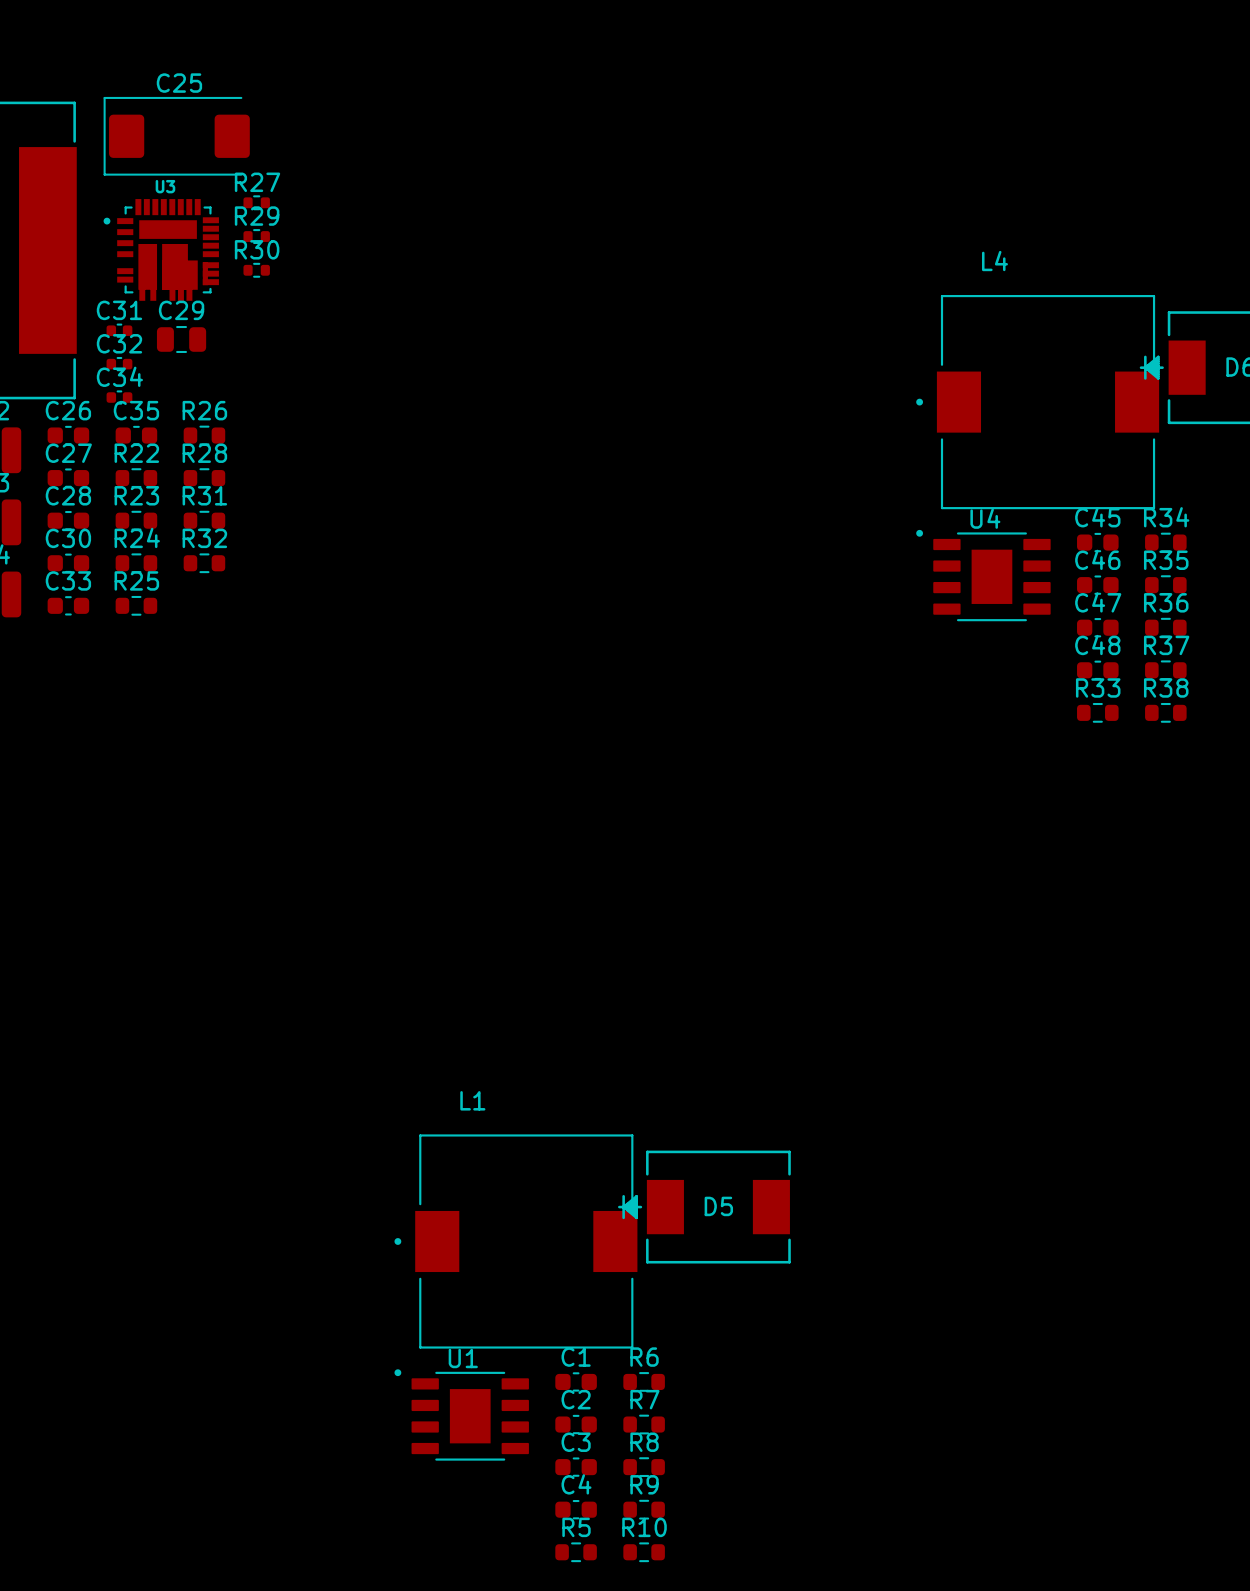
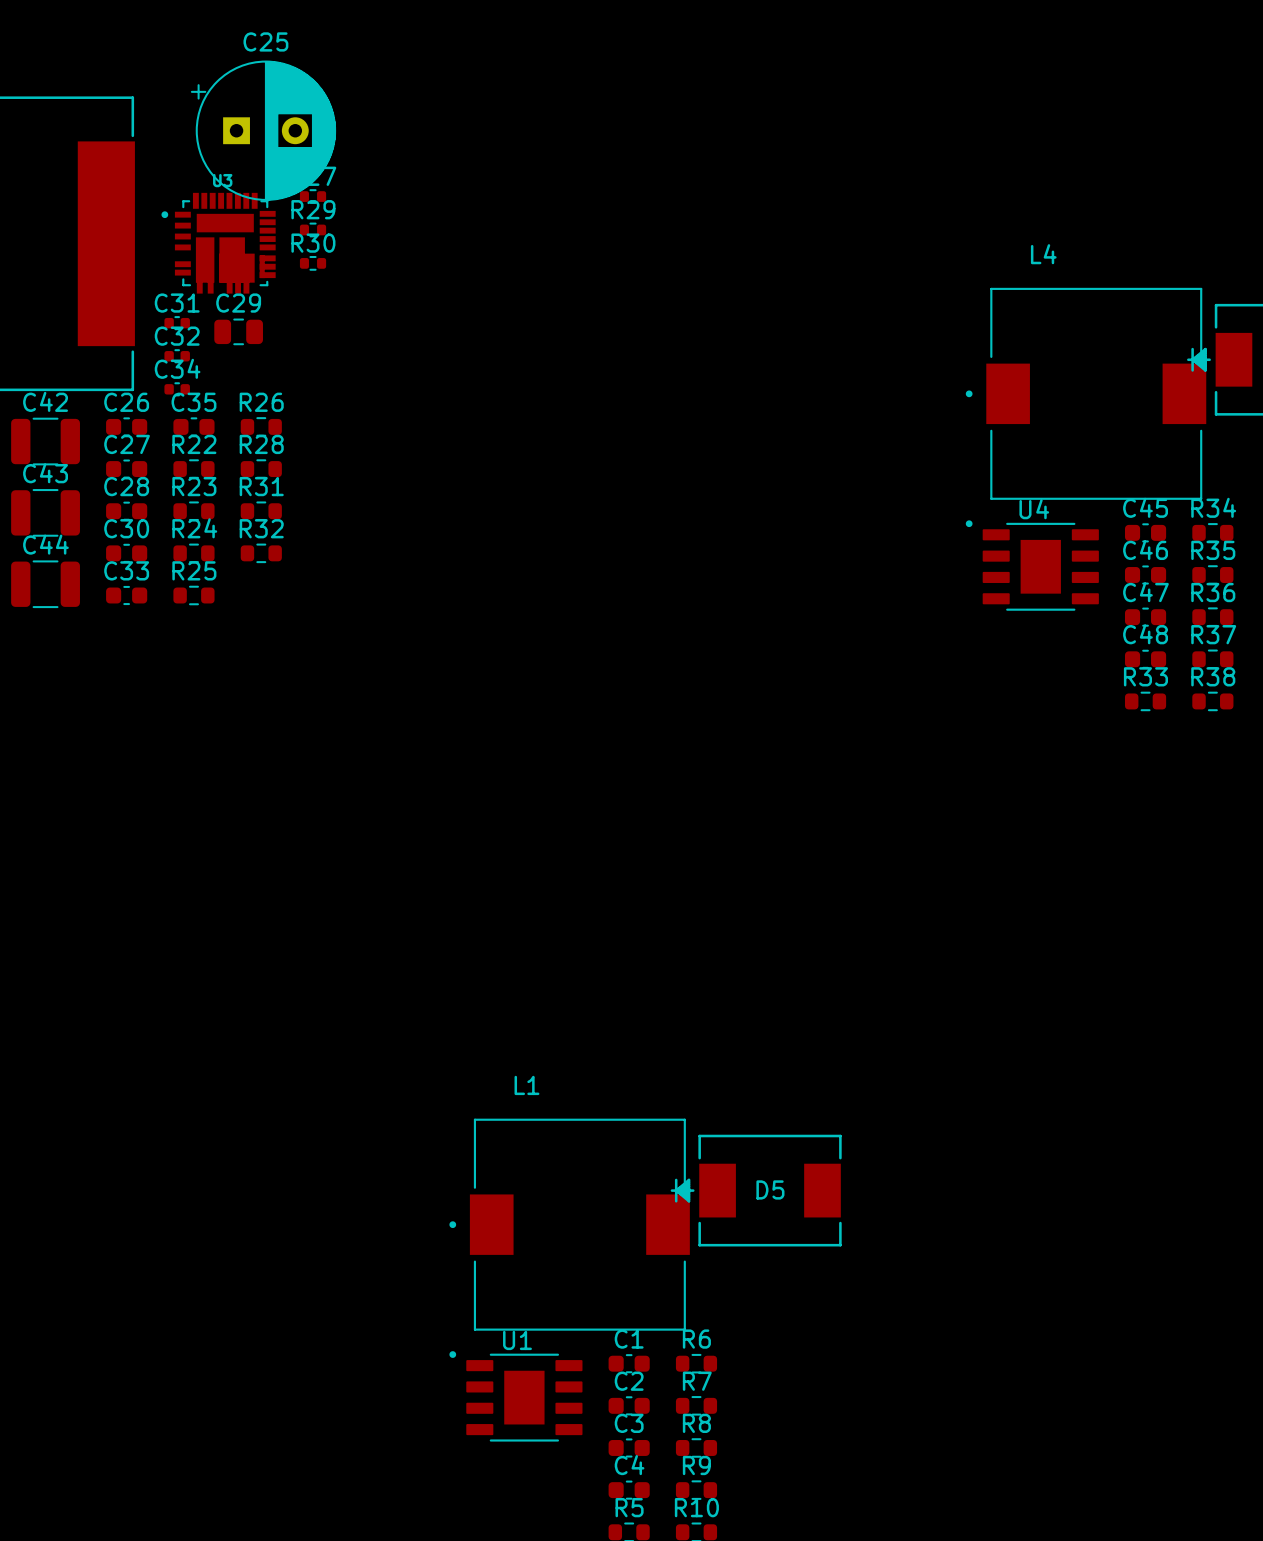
C25 name position: C25 (179, 83) -> C25 (265, 41)
C25 footprint: [103, 96, 250, 176] -> [190, 60, 337, 201]

